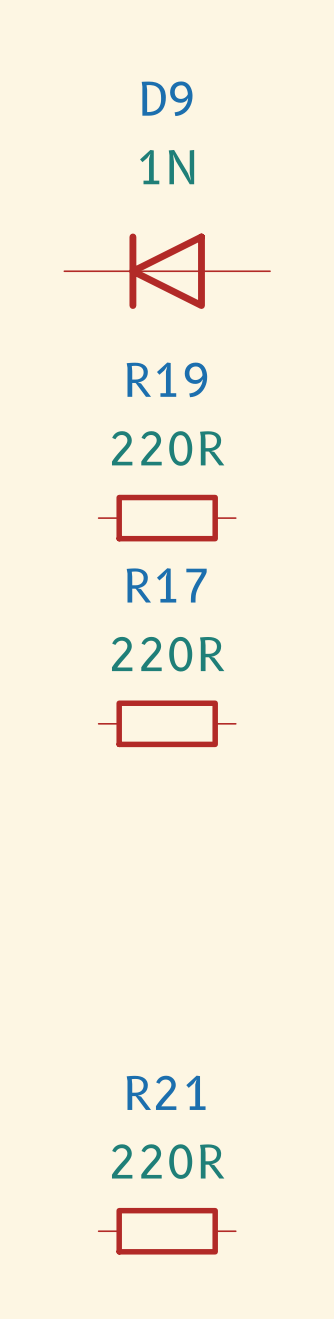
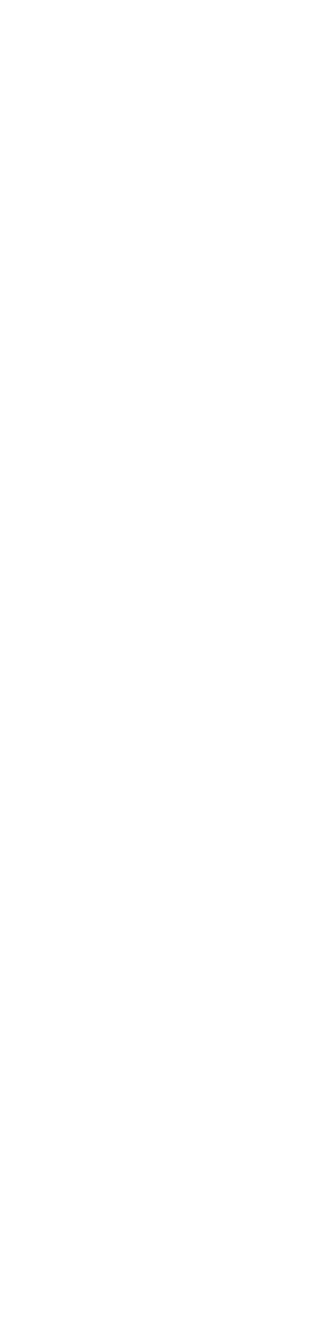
D9: 1N (167, 271) -> none
R19: 220R (167, 518) -> none
R17: 220R (167, 723) -> none
R21: 220R (167, 1231) -> none

